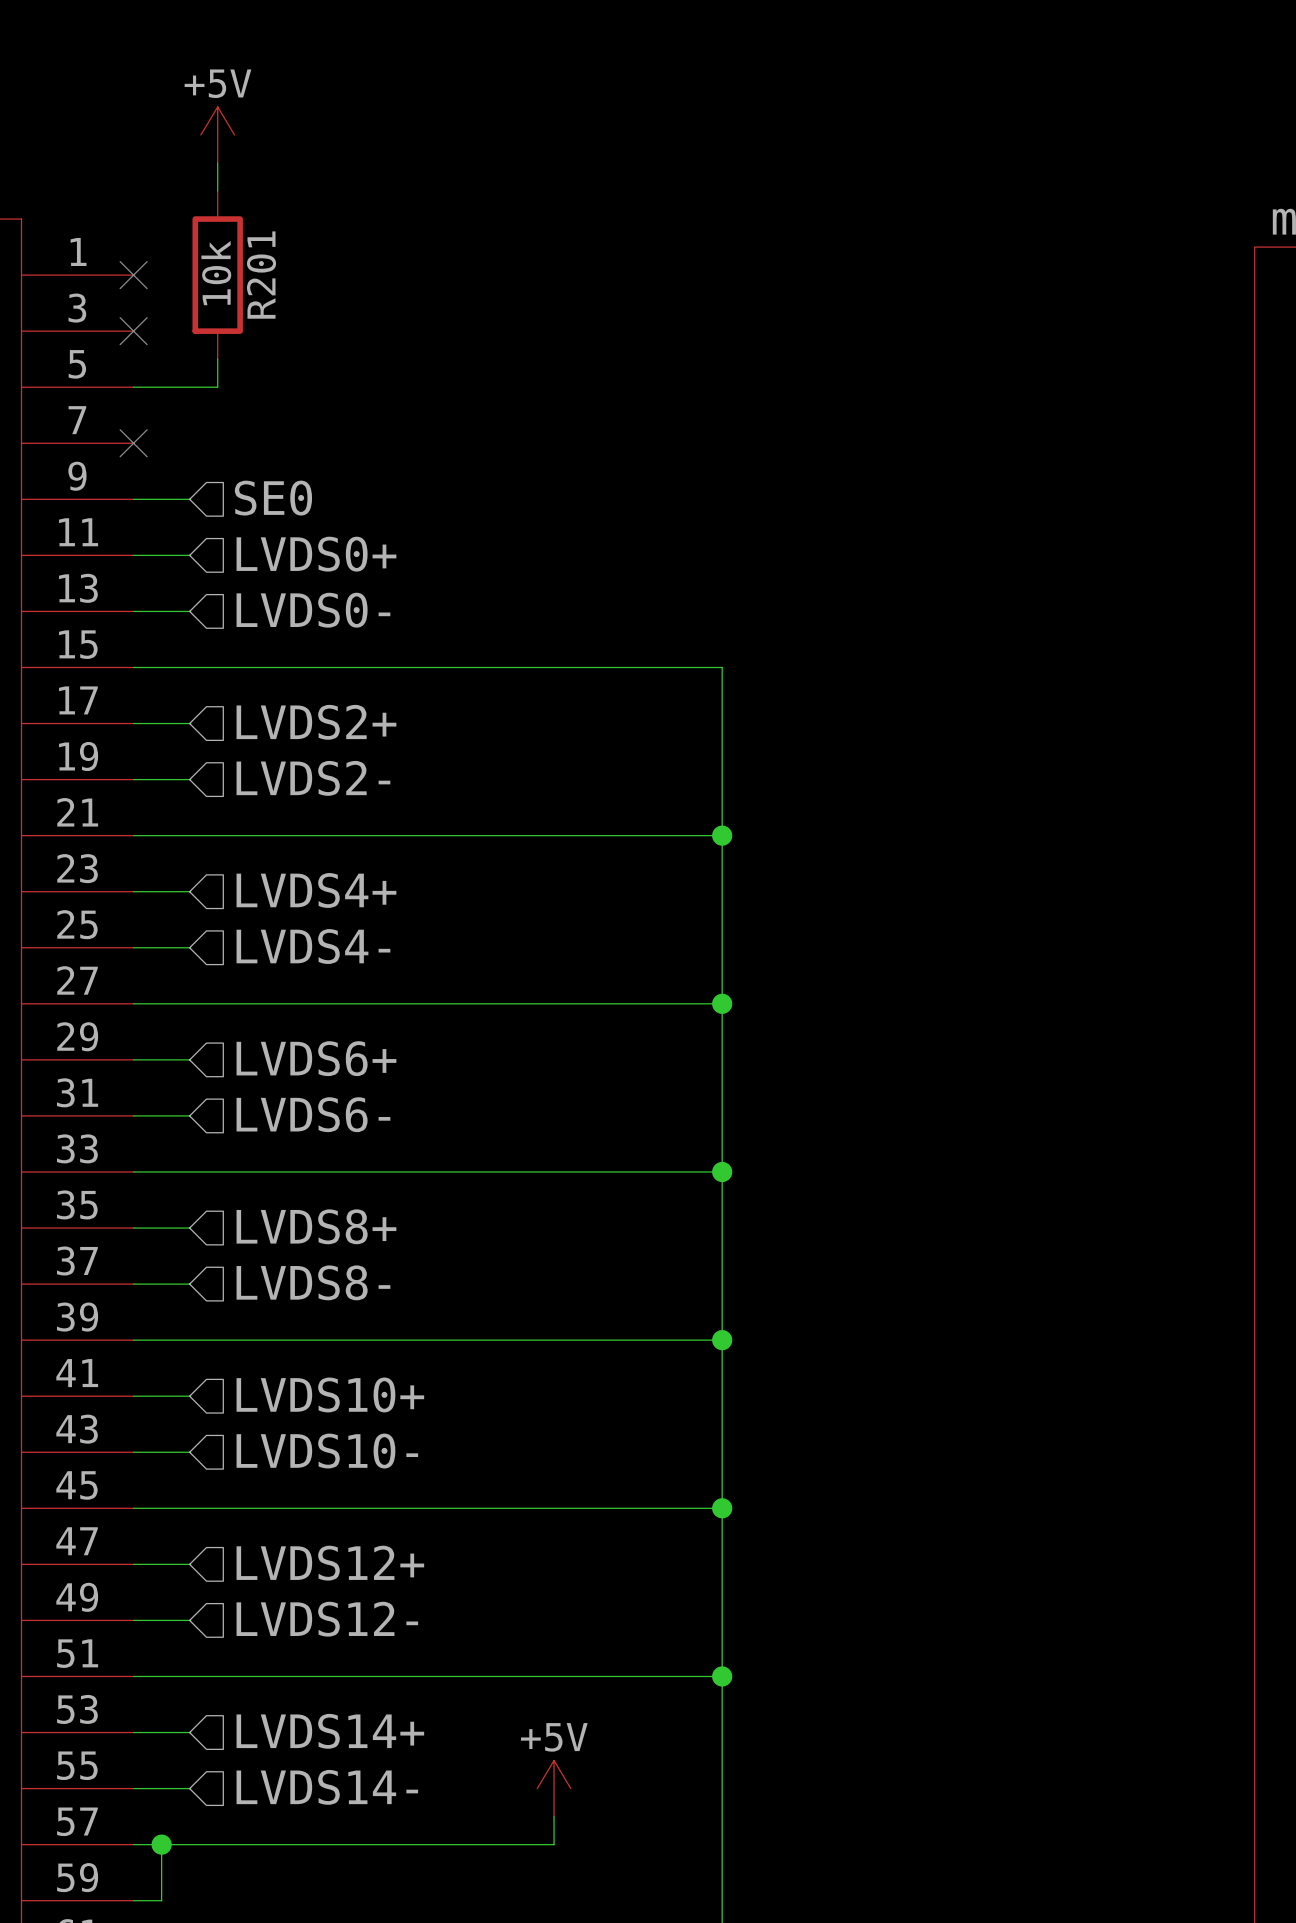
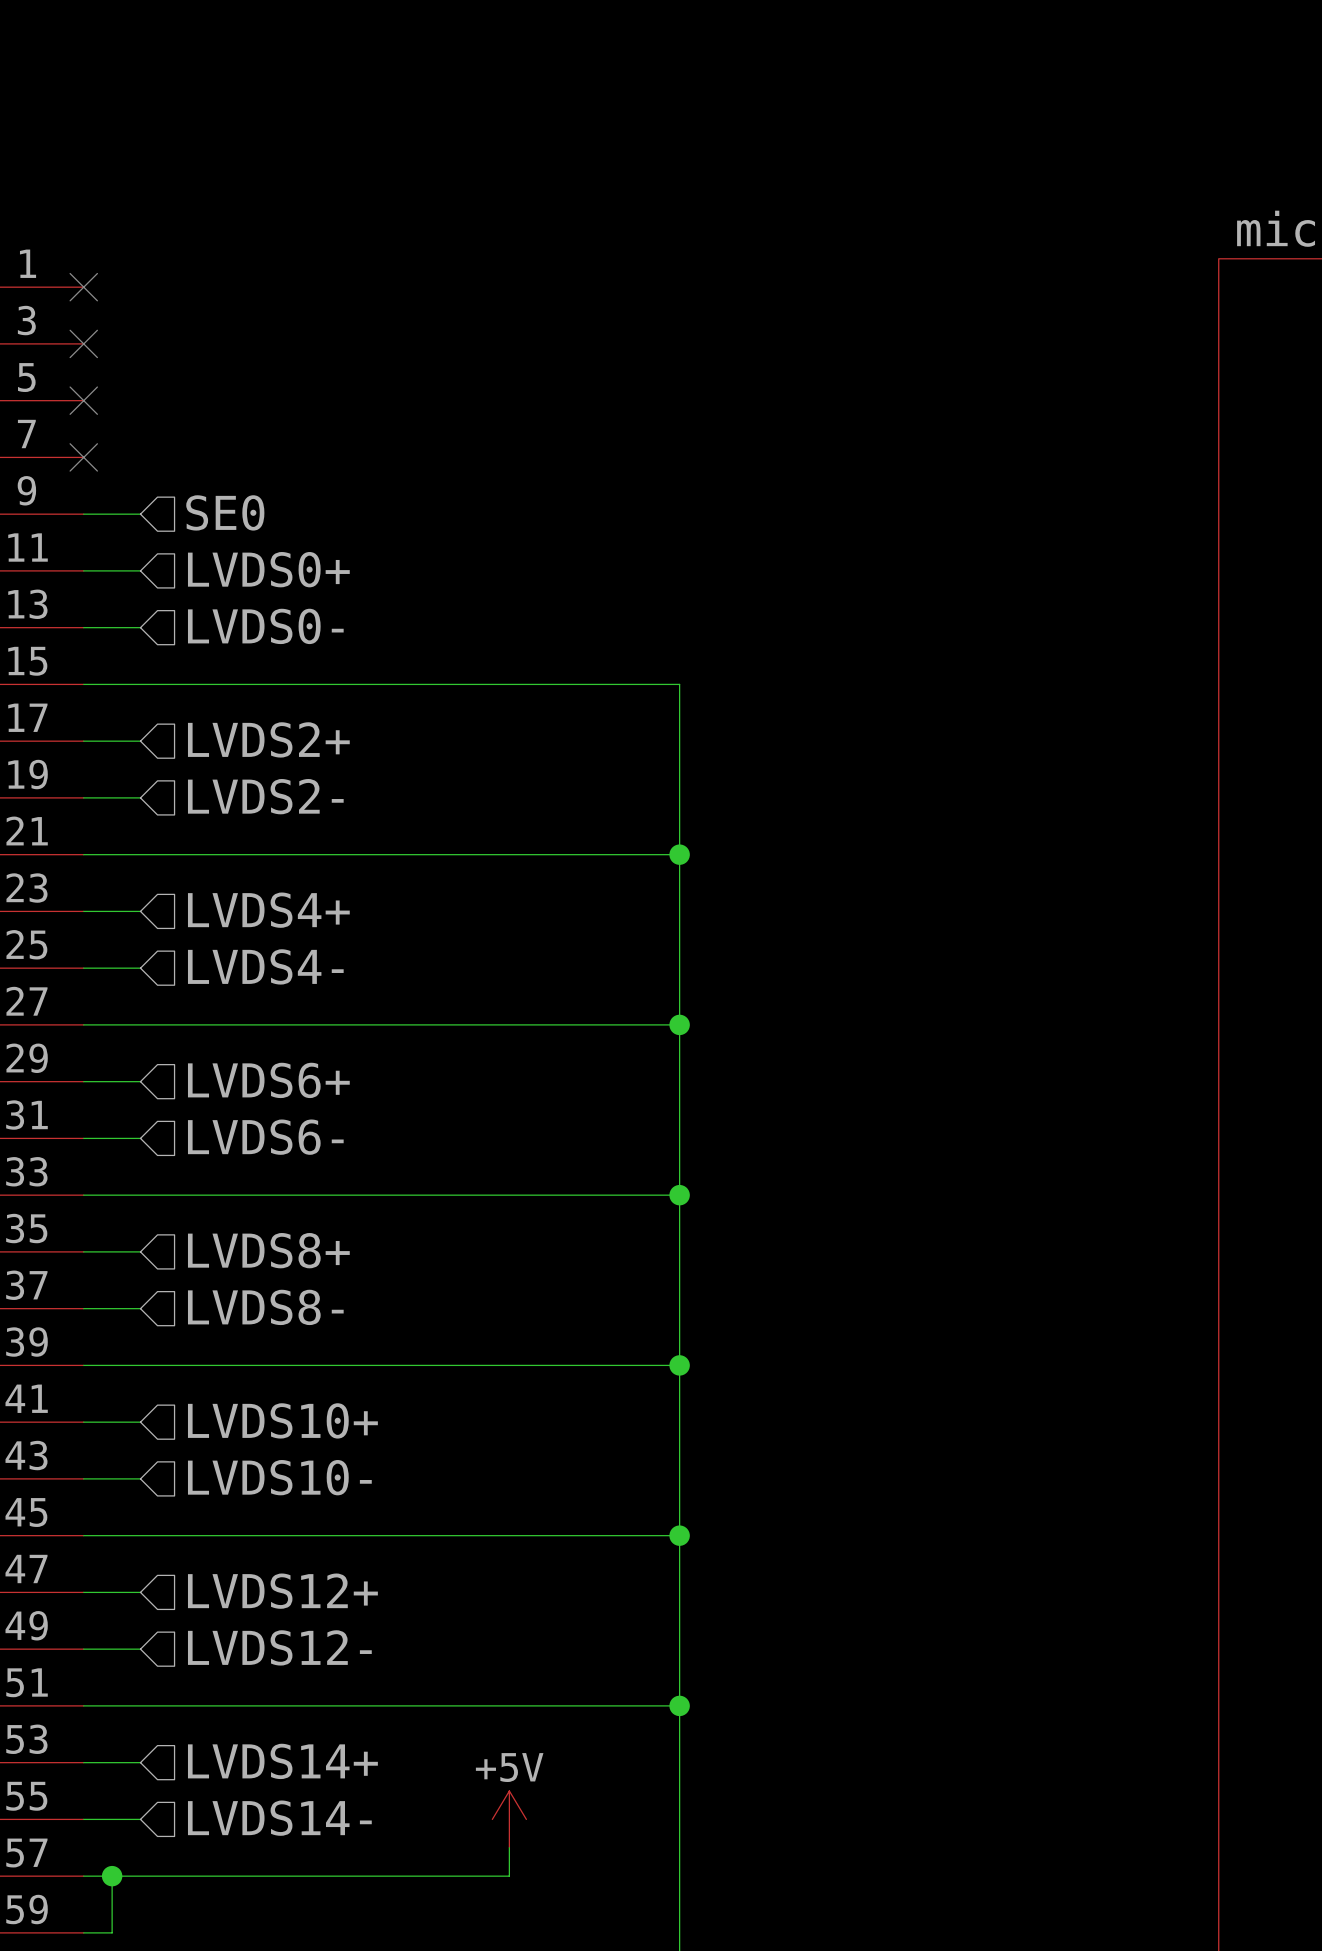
power symbol: +5V (217, 134) -> none
wire: (217, 162) (217, 191) -> none
R201: 10k (217, 275) -> none
wire: (217, 359) (217, 387) (133, 387) -> none
no-connect mark: none -> (83, 400)

